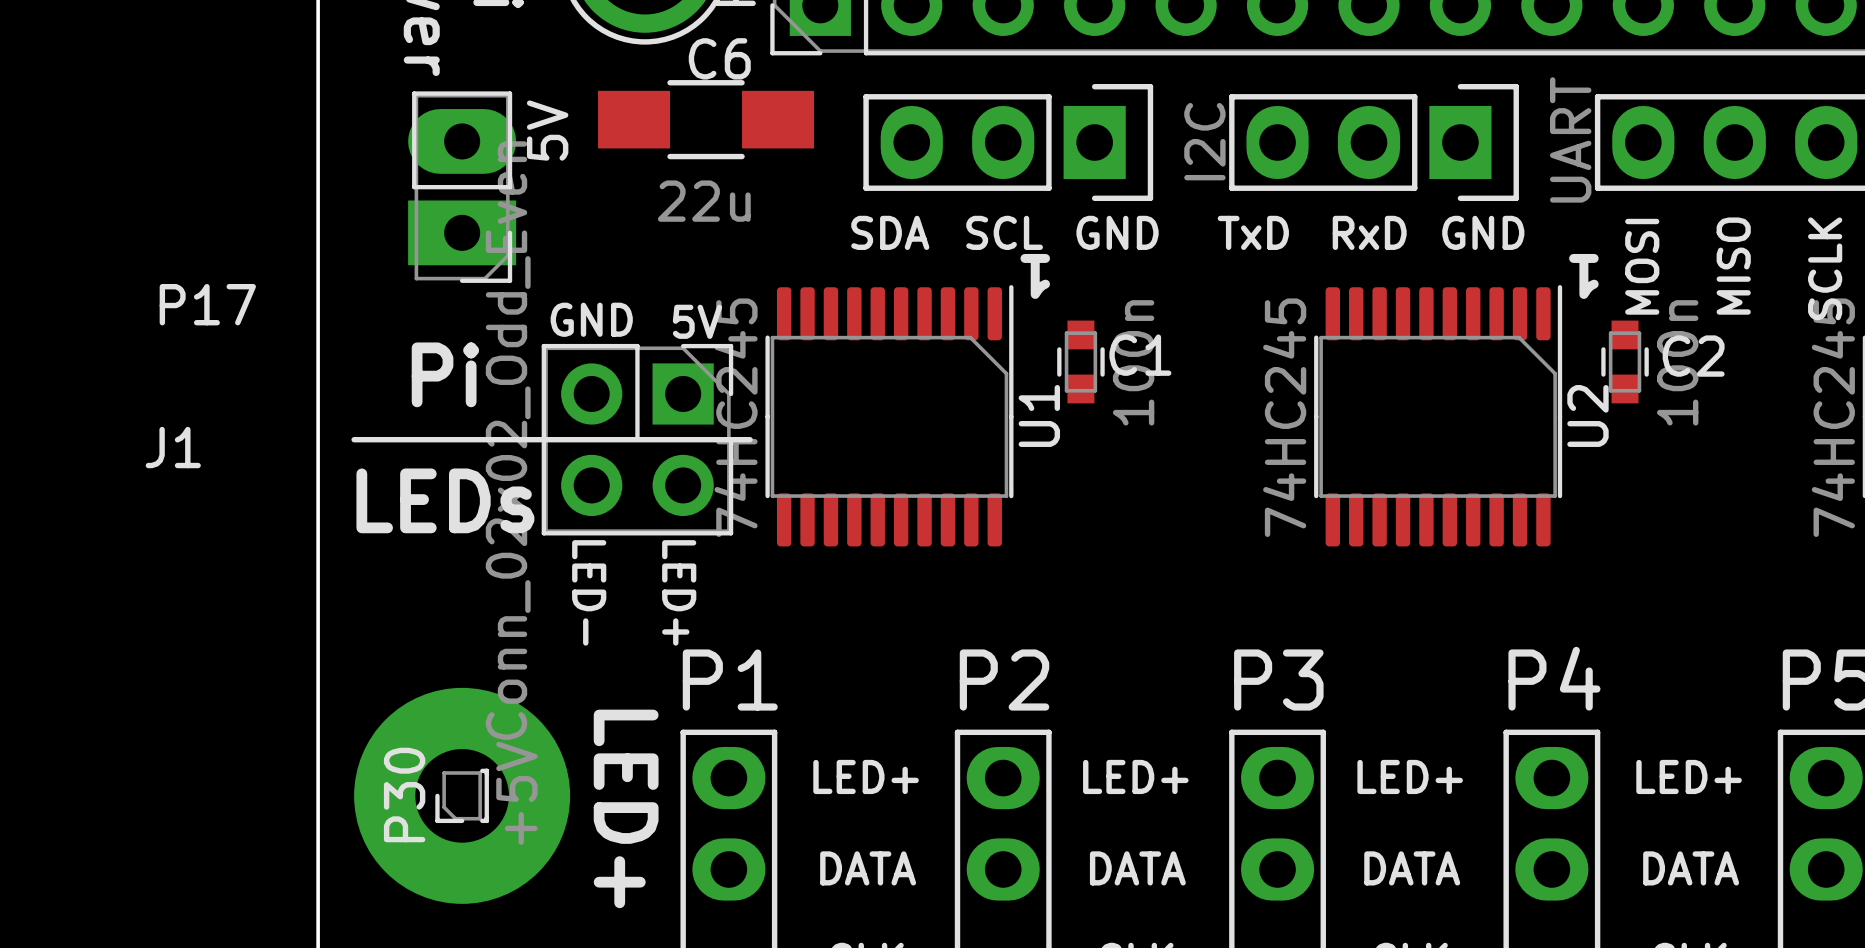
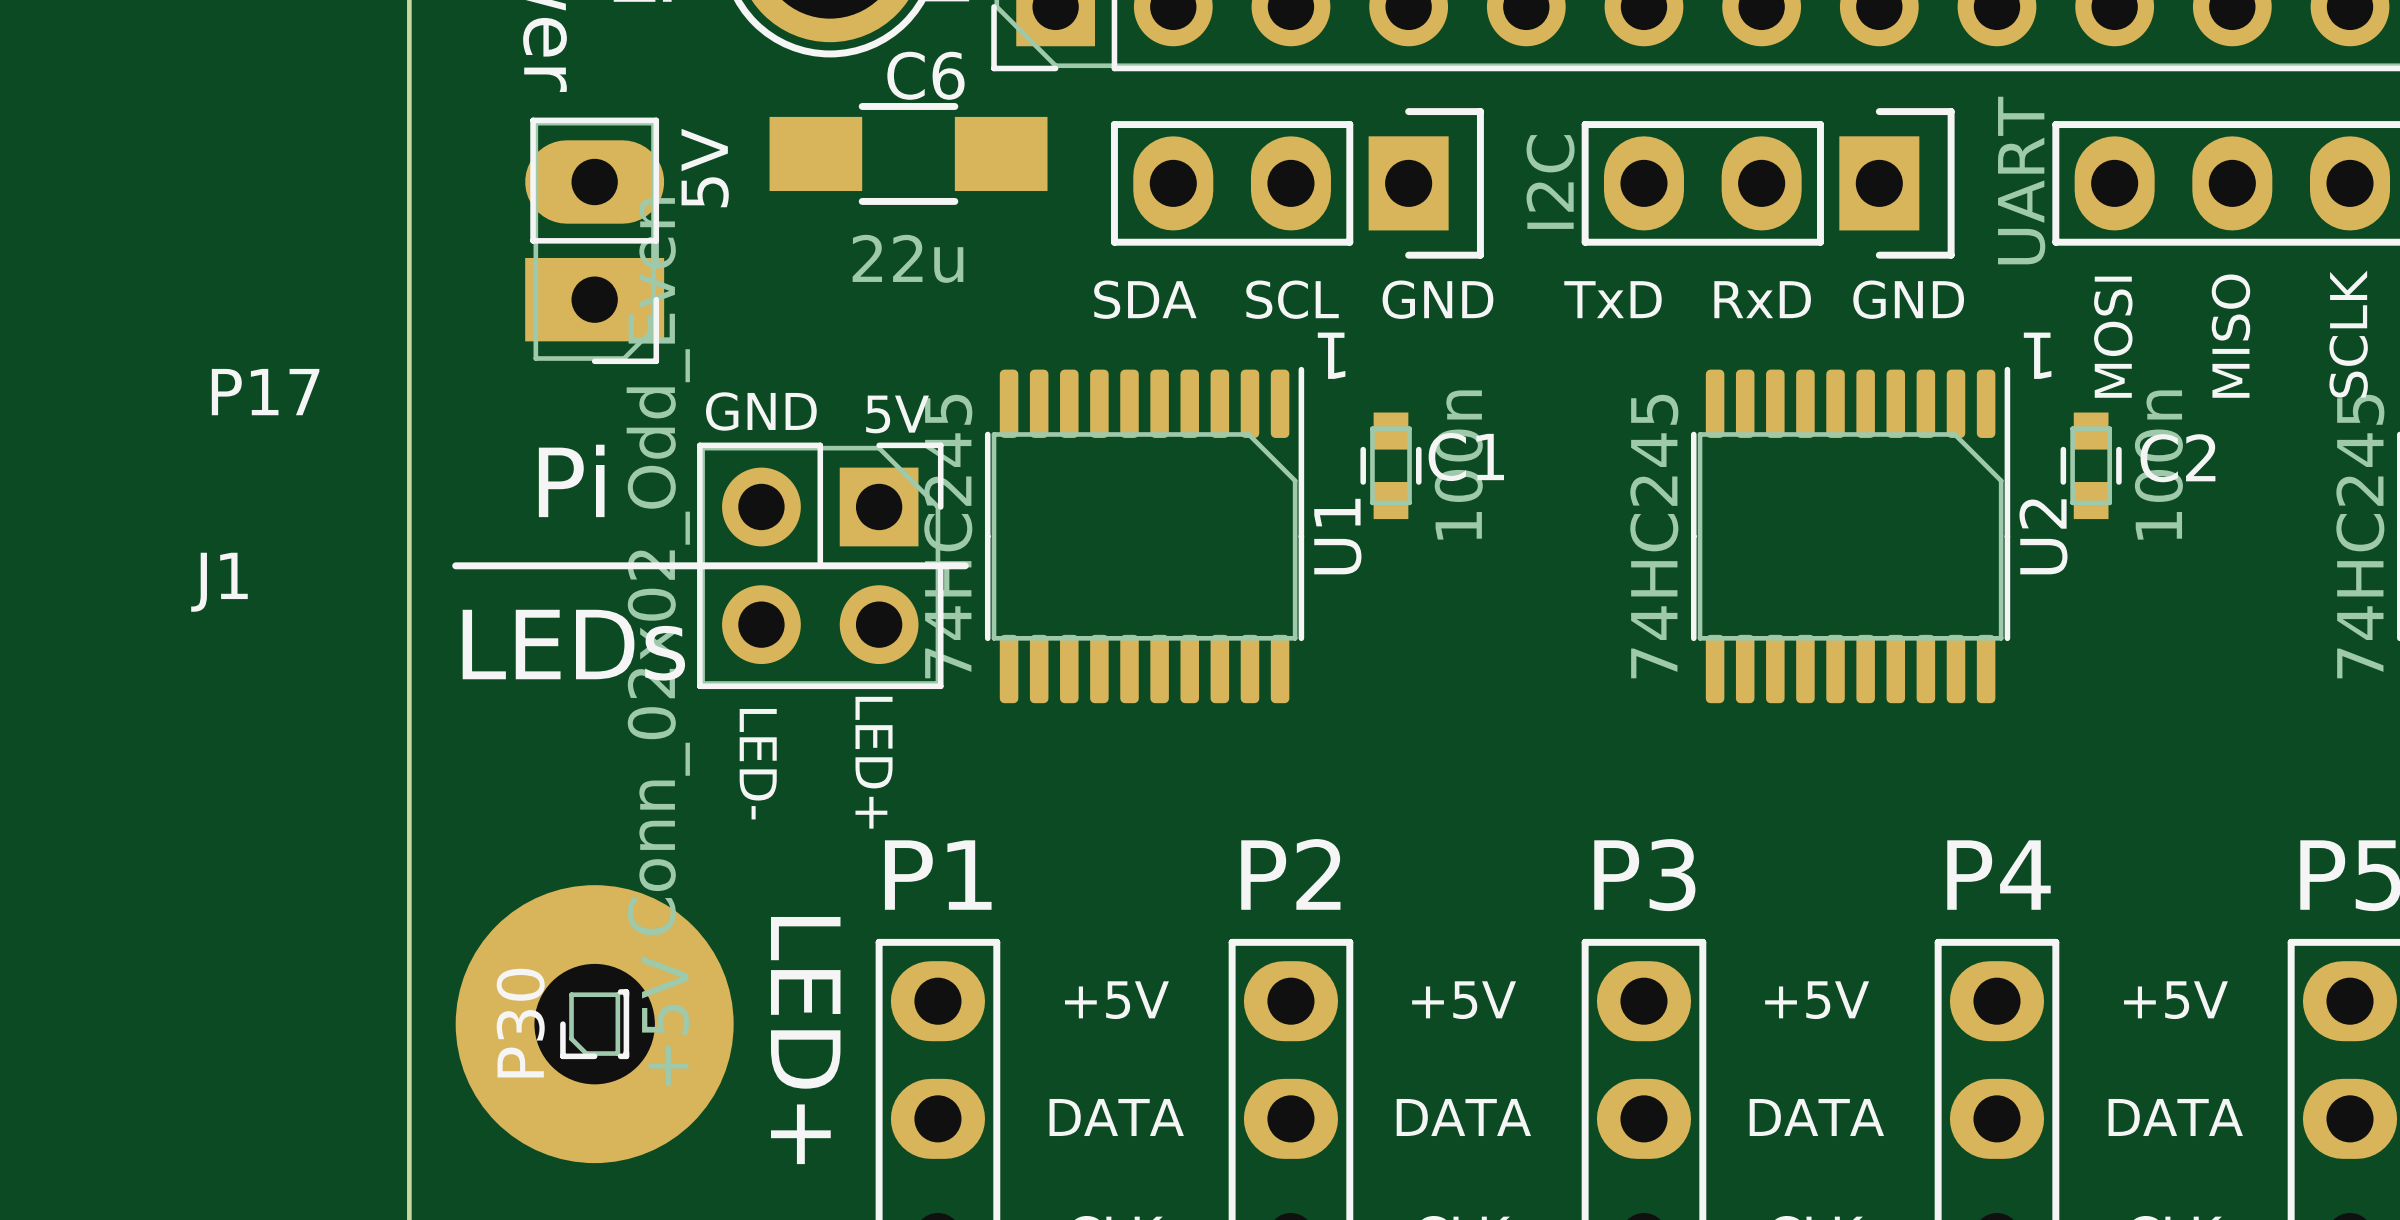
text: LED+ (866, 776) -> +5V (1116, 1000)
text: LED+ (1135, 776) -> +5V (1464, 1000)
text: LED+ (1410, 776) -> +5V (1817, 1000)
text: LED+ (1689, 776) -> +5V (2175, 1000)

